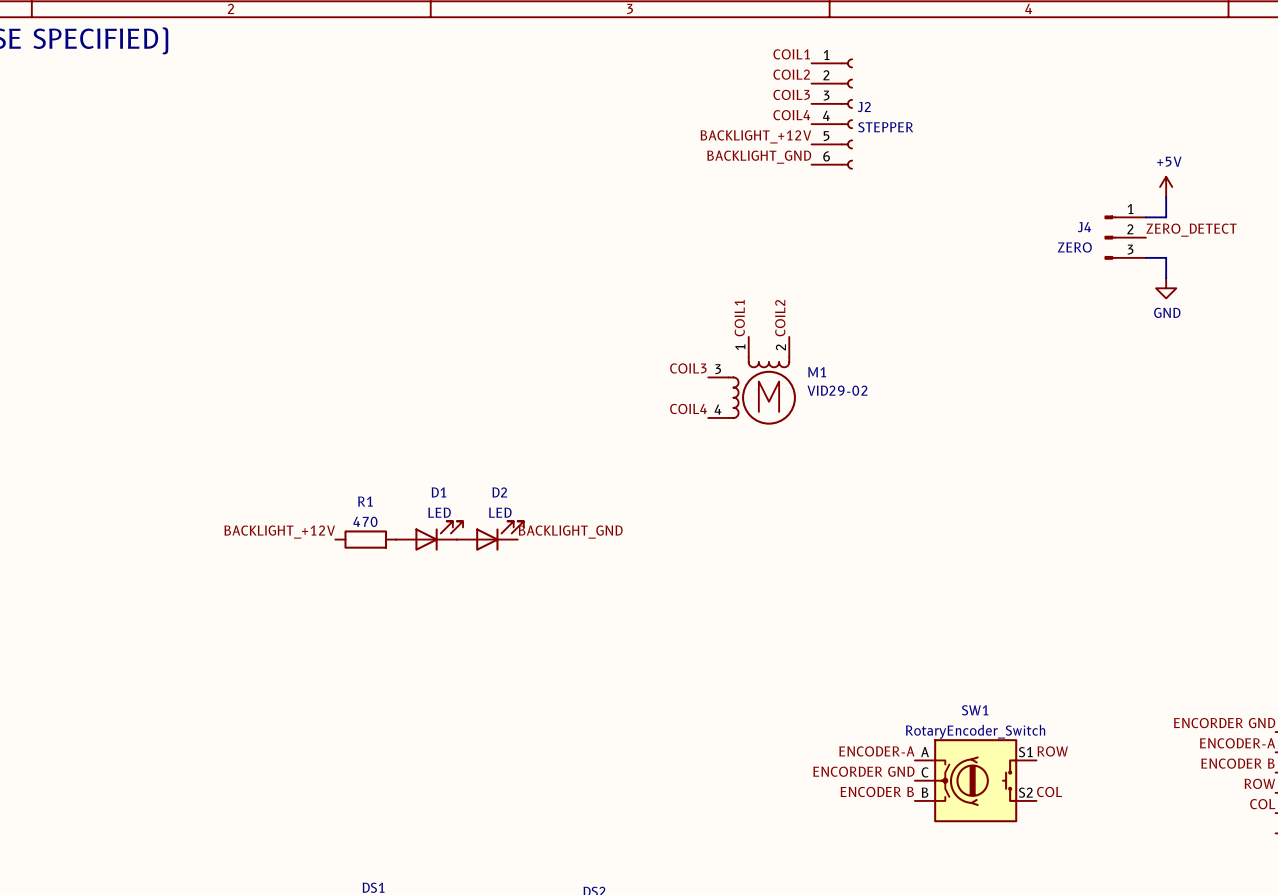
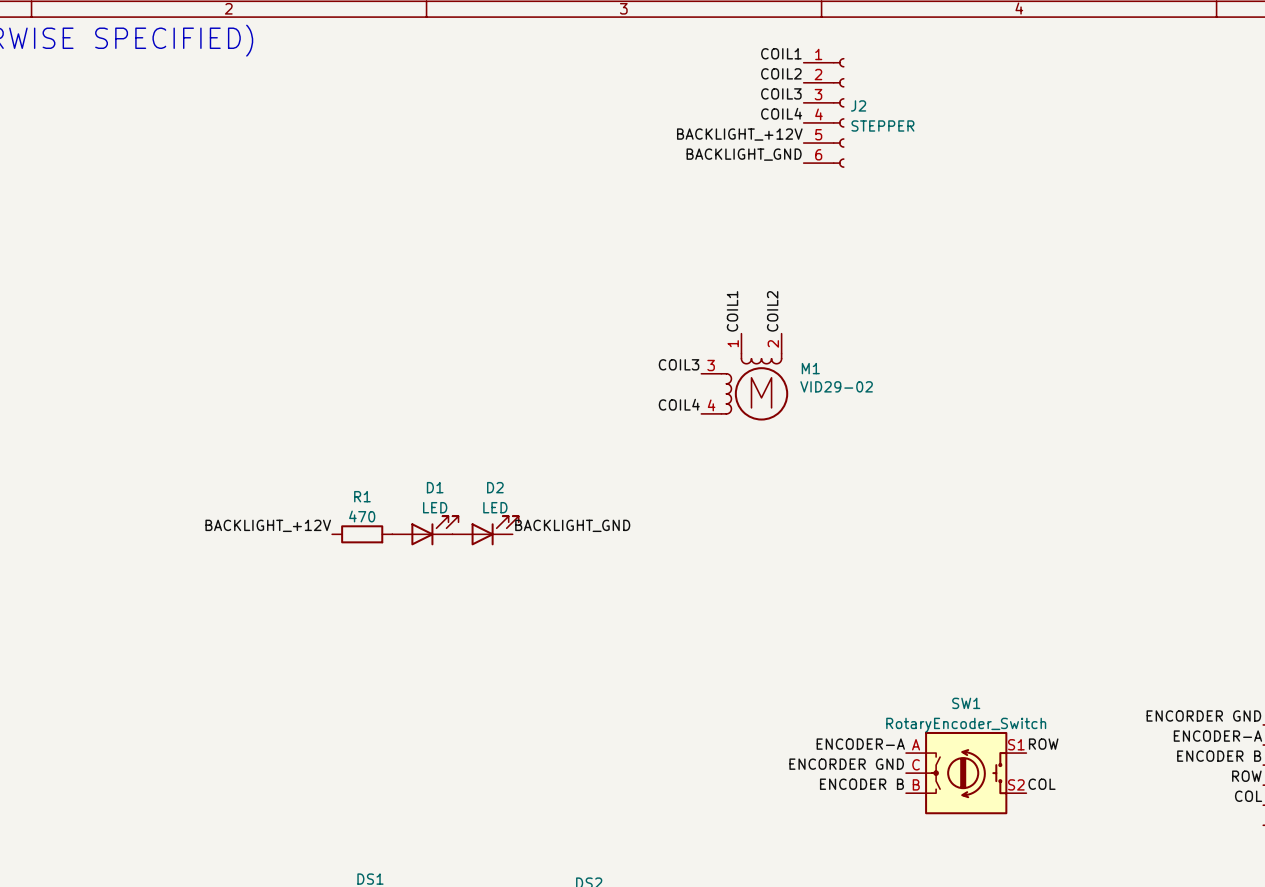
power symbol: +5V (1166, 186) -> none
wire: (1166, 197) (1166, 217) (1145, 217) -> none
label: ZERO_DETECT (1191, 230) -> none
J4: ZERO (1125, 237) -> none
wire: (1145, 257) (1166, 257) (1166, 278) -> none
power symbol: GND (1166, 288) -> none
SW1 symbol: [914, 739, 1037, 823] -> [906, 731, 1027, 815]

